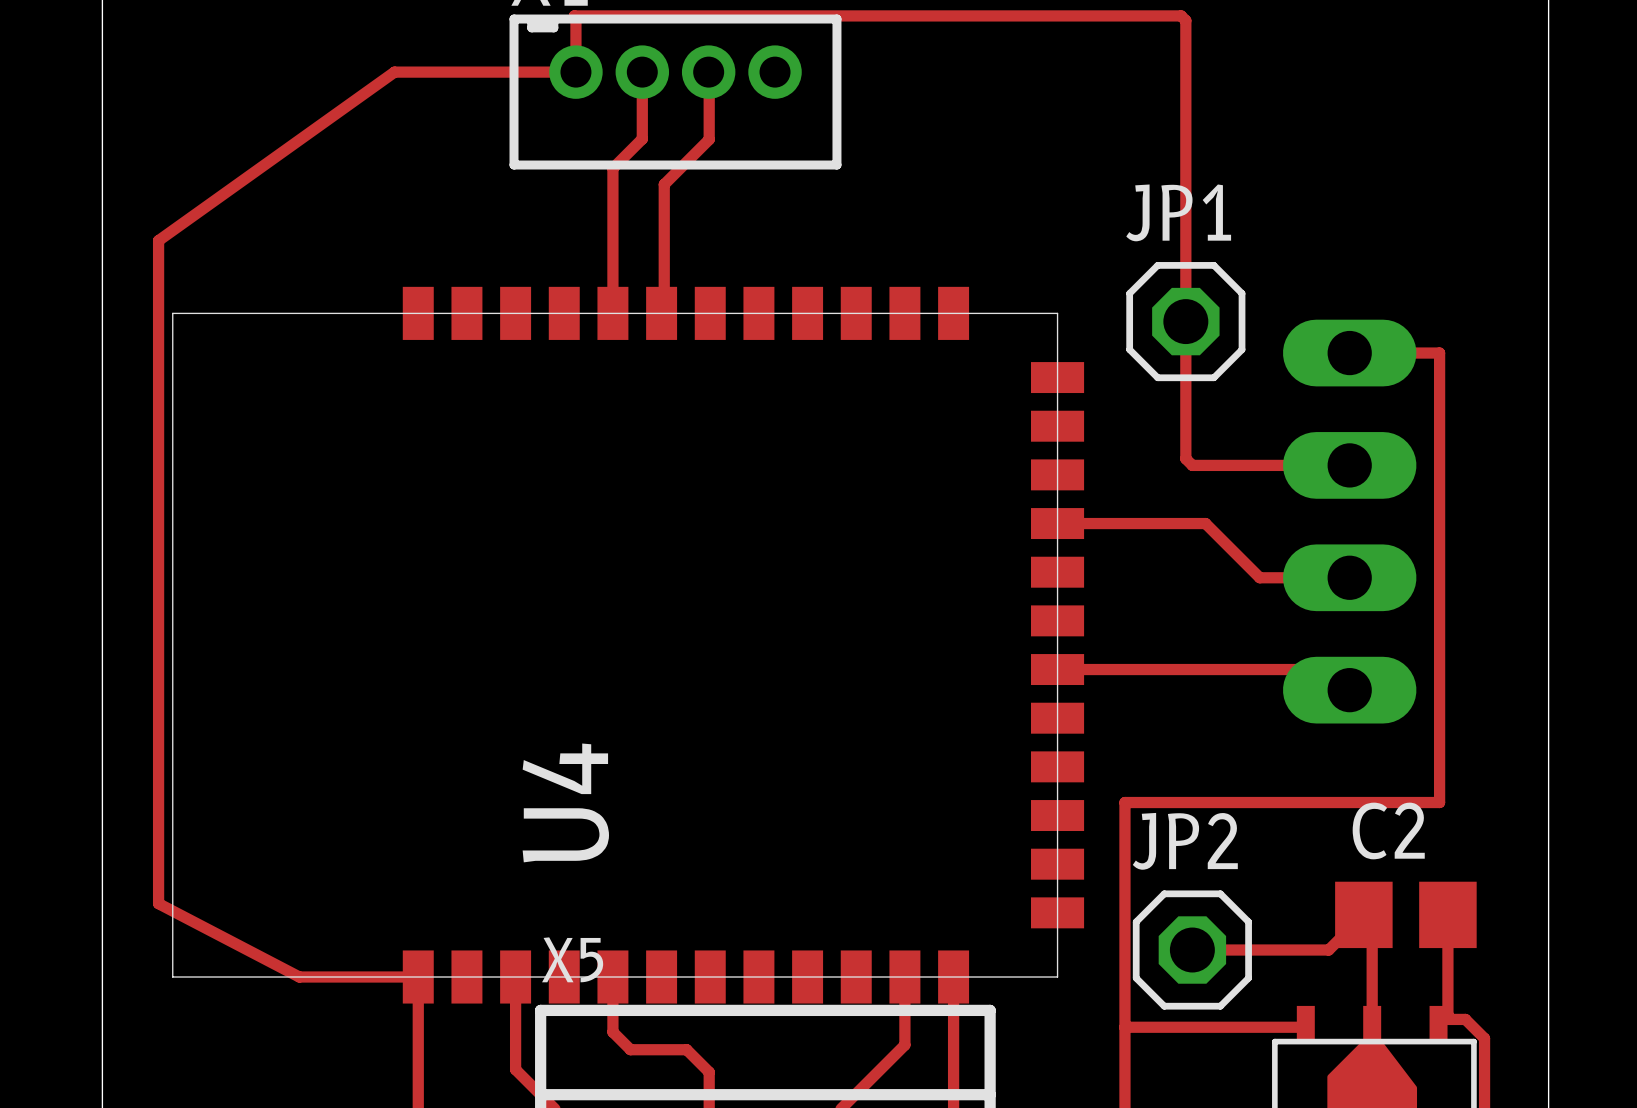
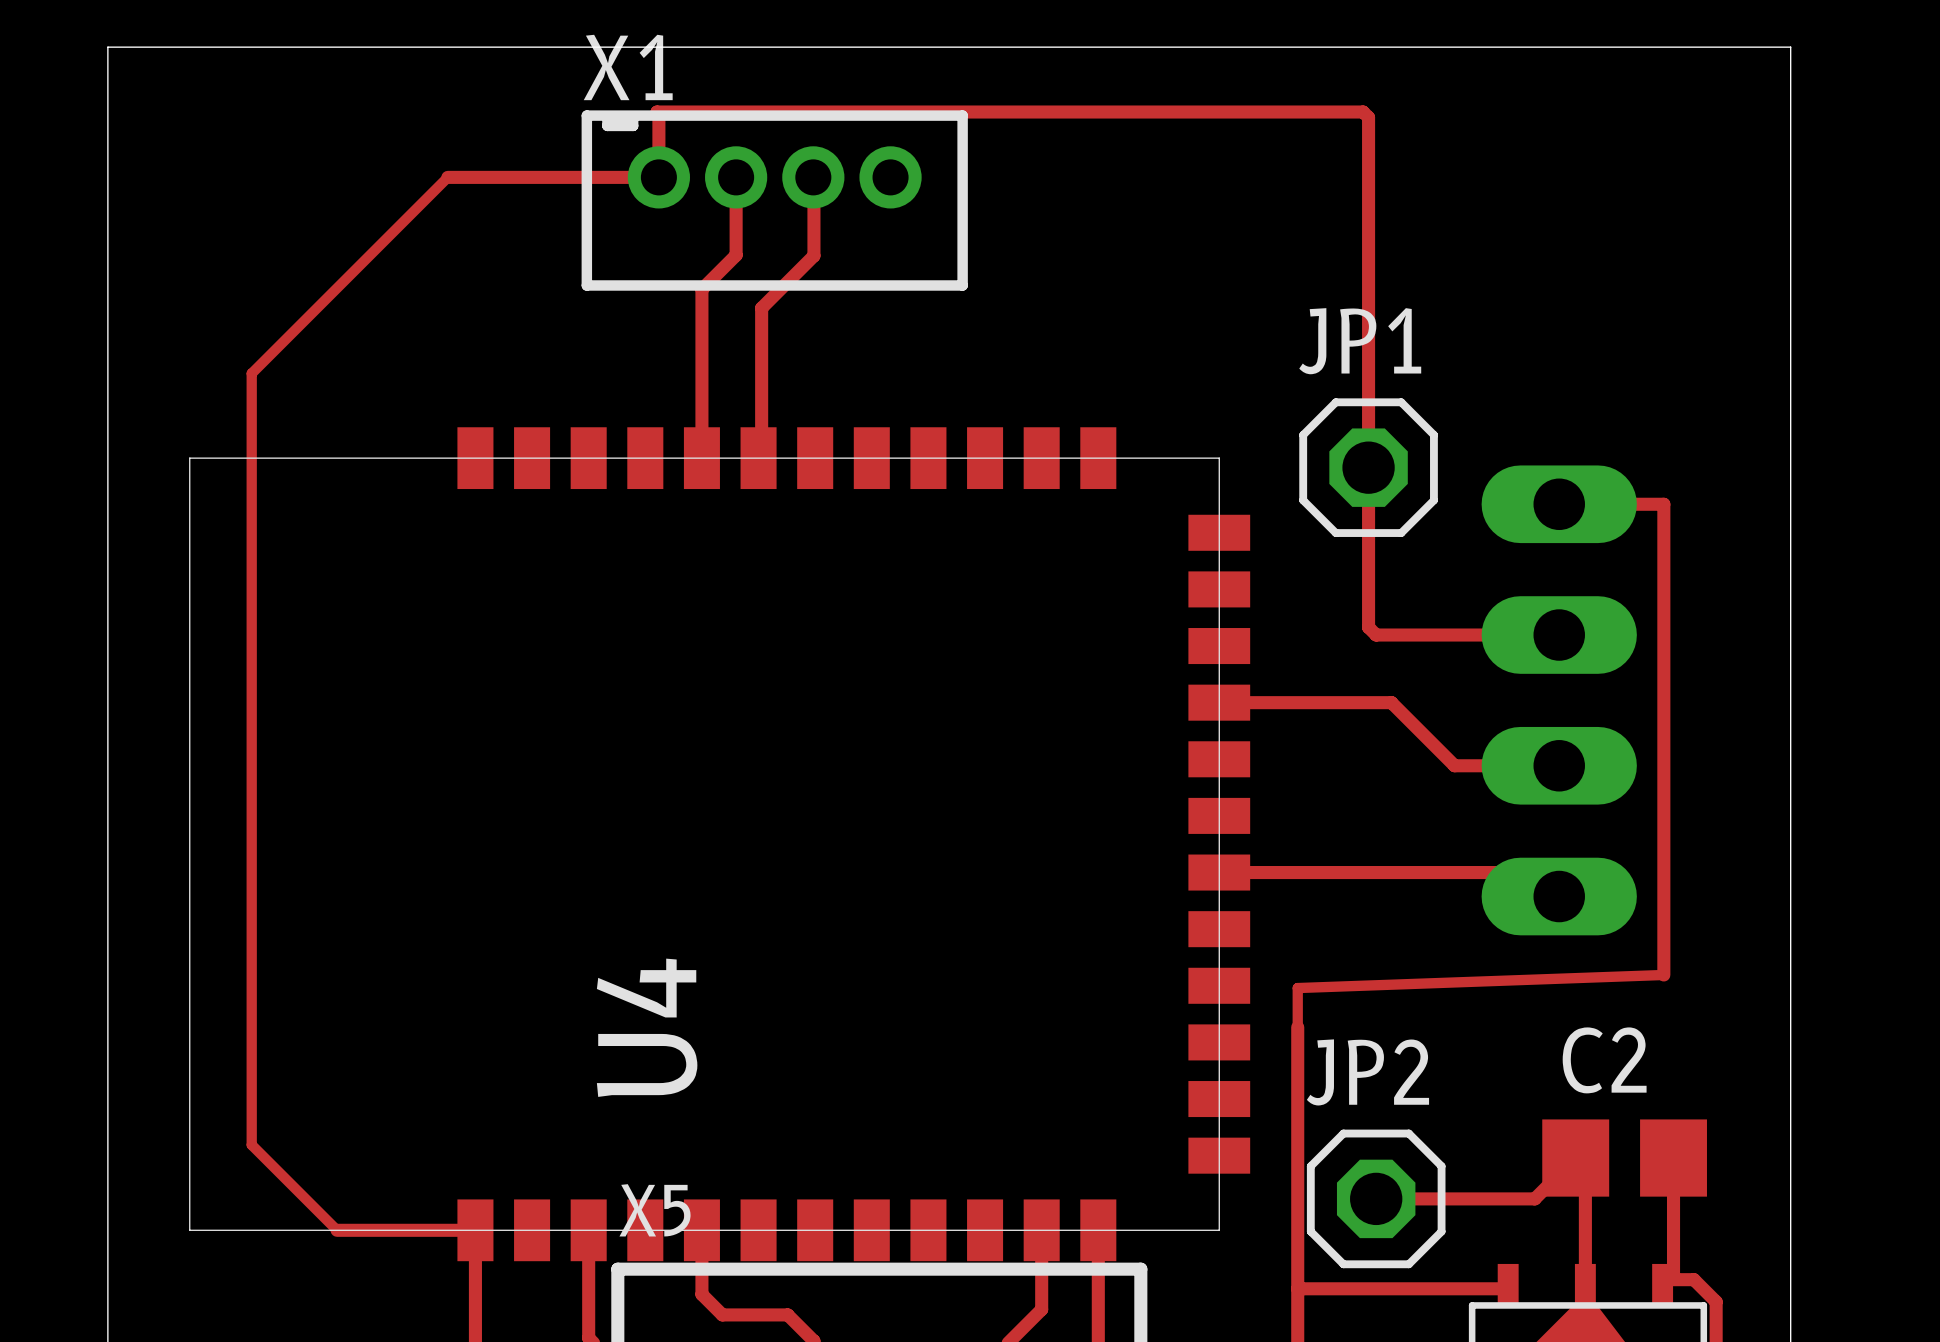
top track: (394, 72) (158, 240) (158, 903) (299, 977) -> (447, 177) (251, 373) (251, 1144) (337, 1230)
top track: (1439, 757) (1439, 802) (1124, 802) -> (1663, 974) (1297, 988) (1297, 1027)

